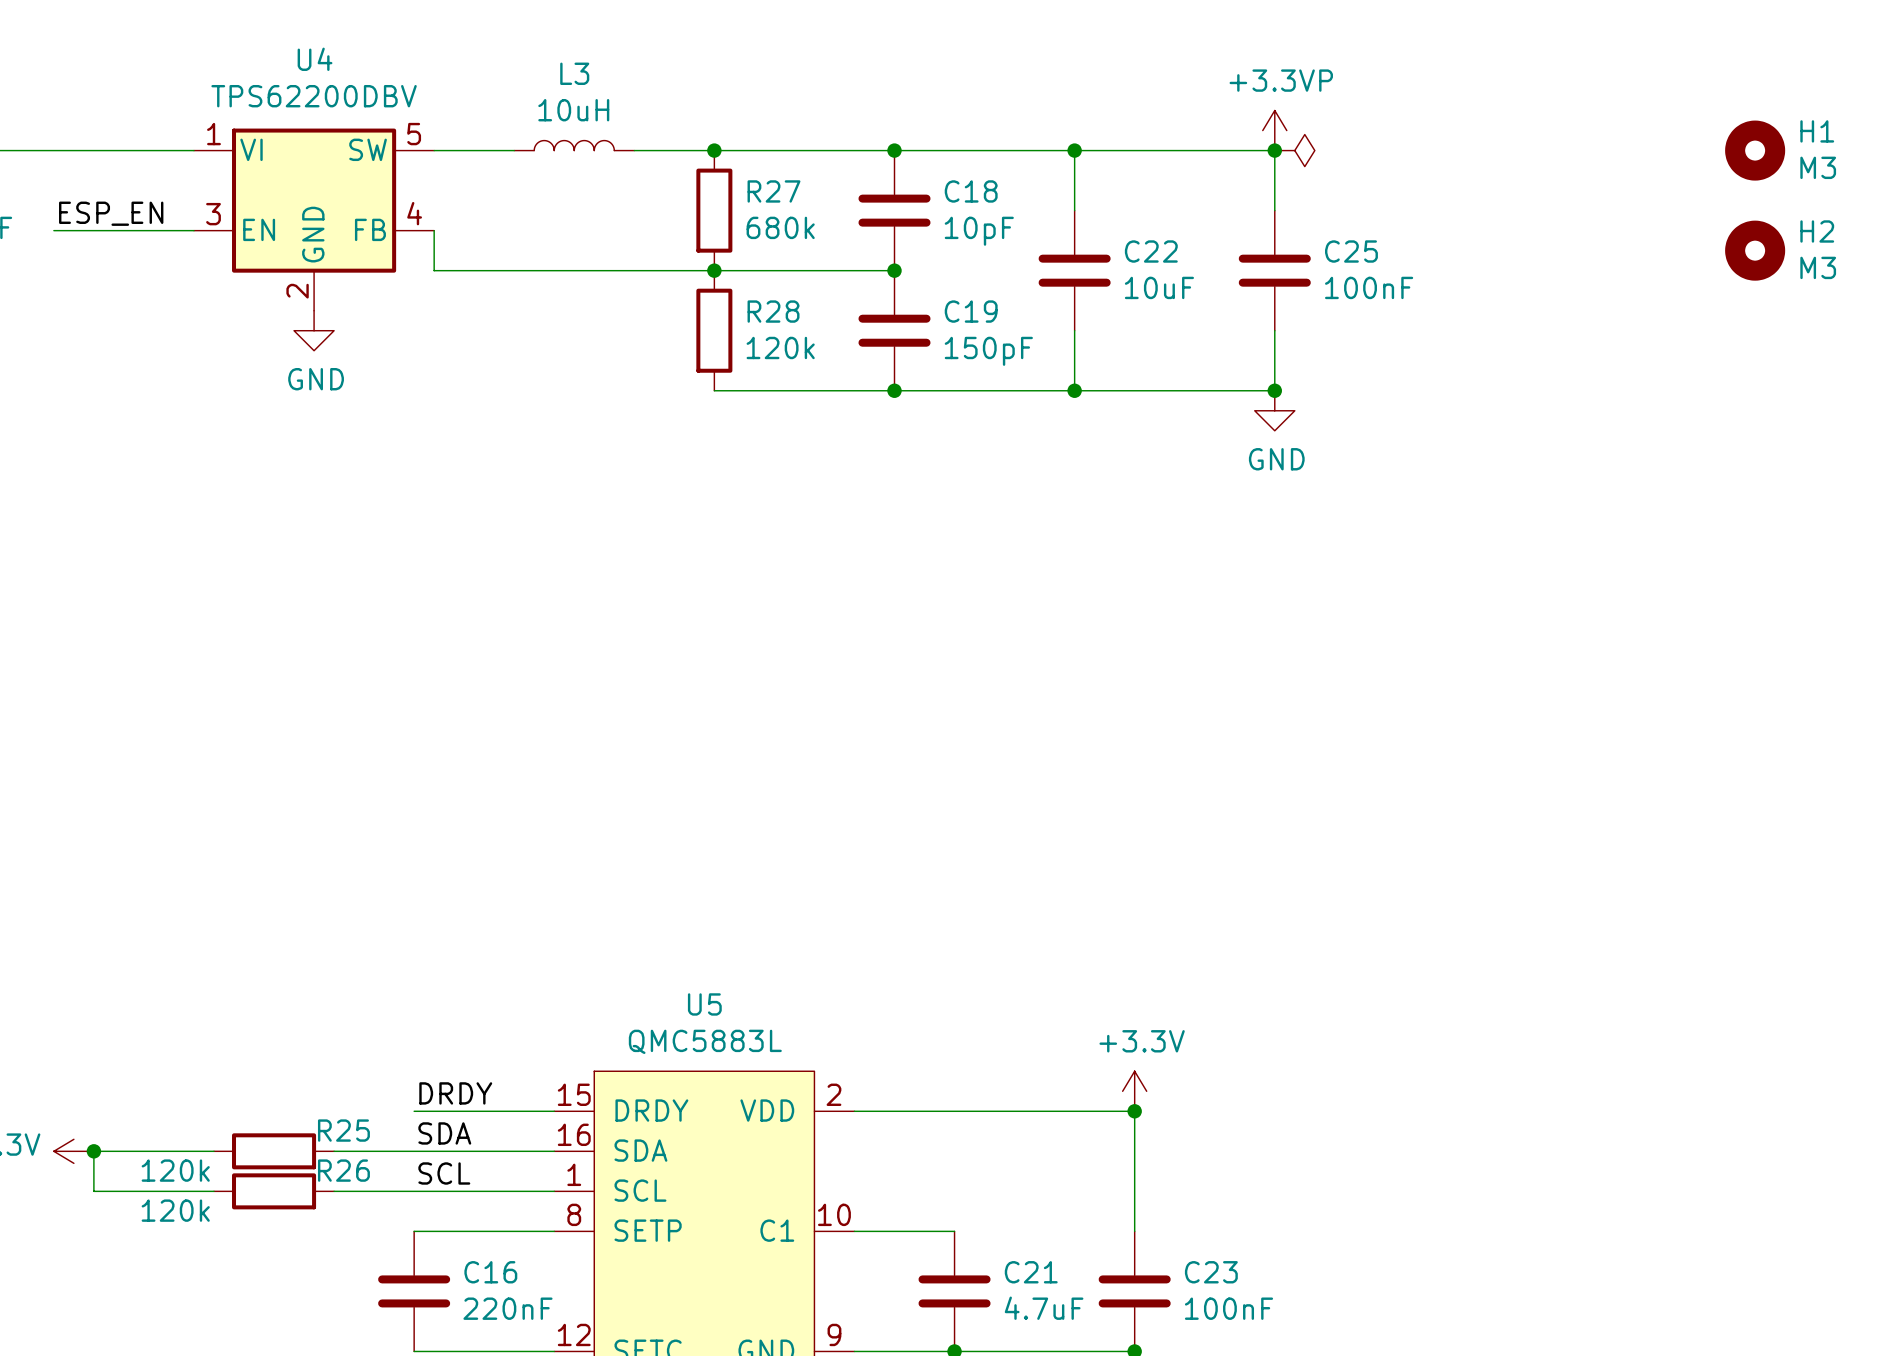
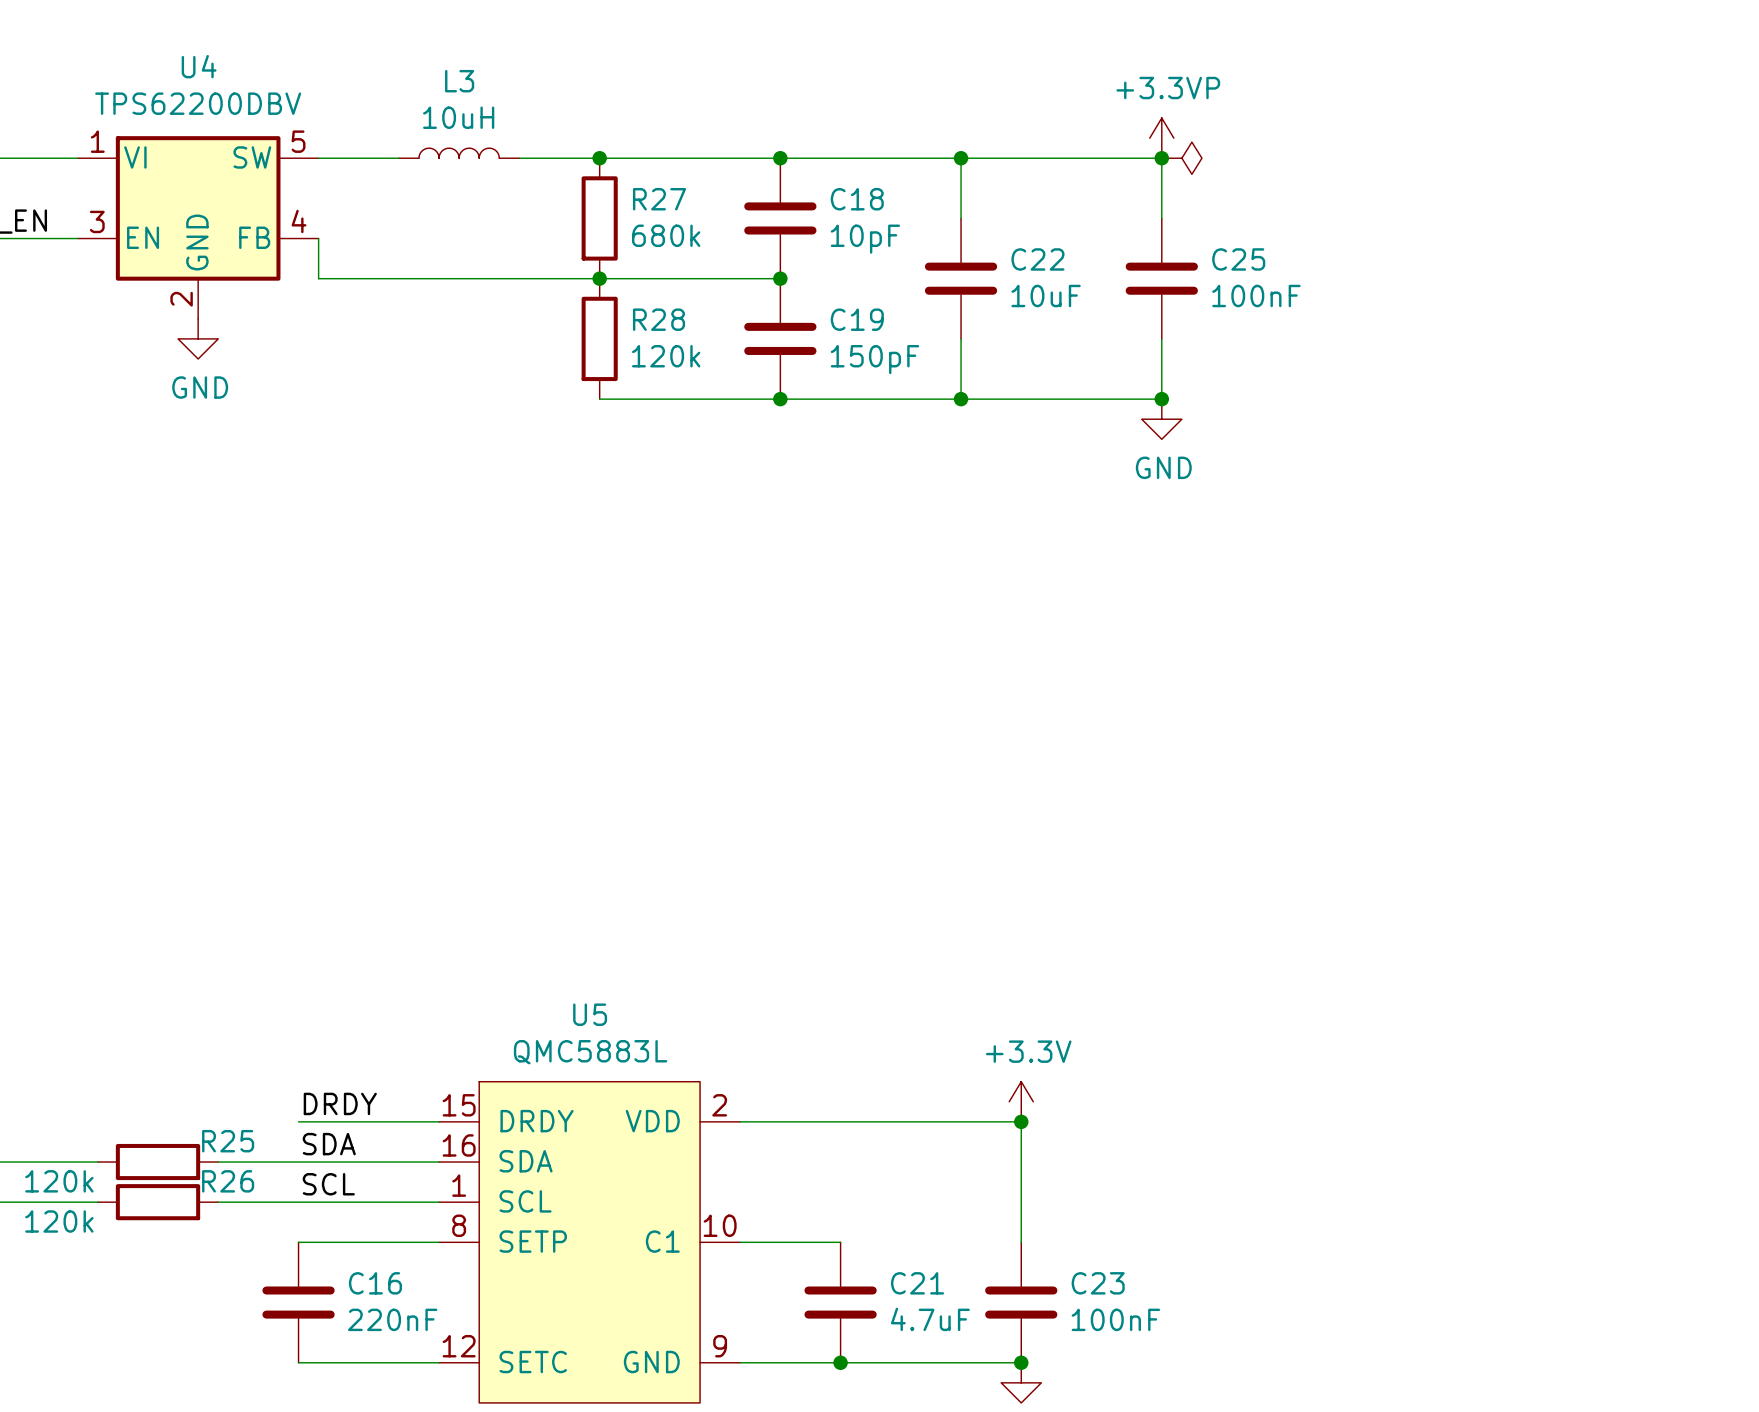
H1: M3 (1755, 150) -> none
H2: M3 (1755, 250) -> none

